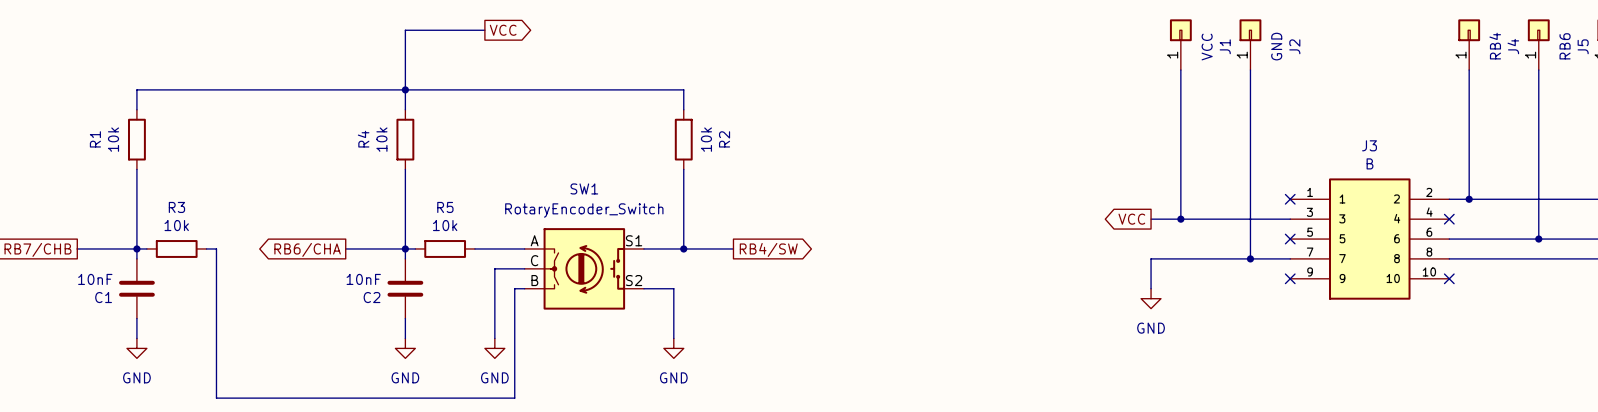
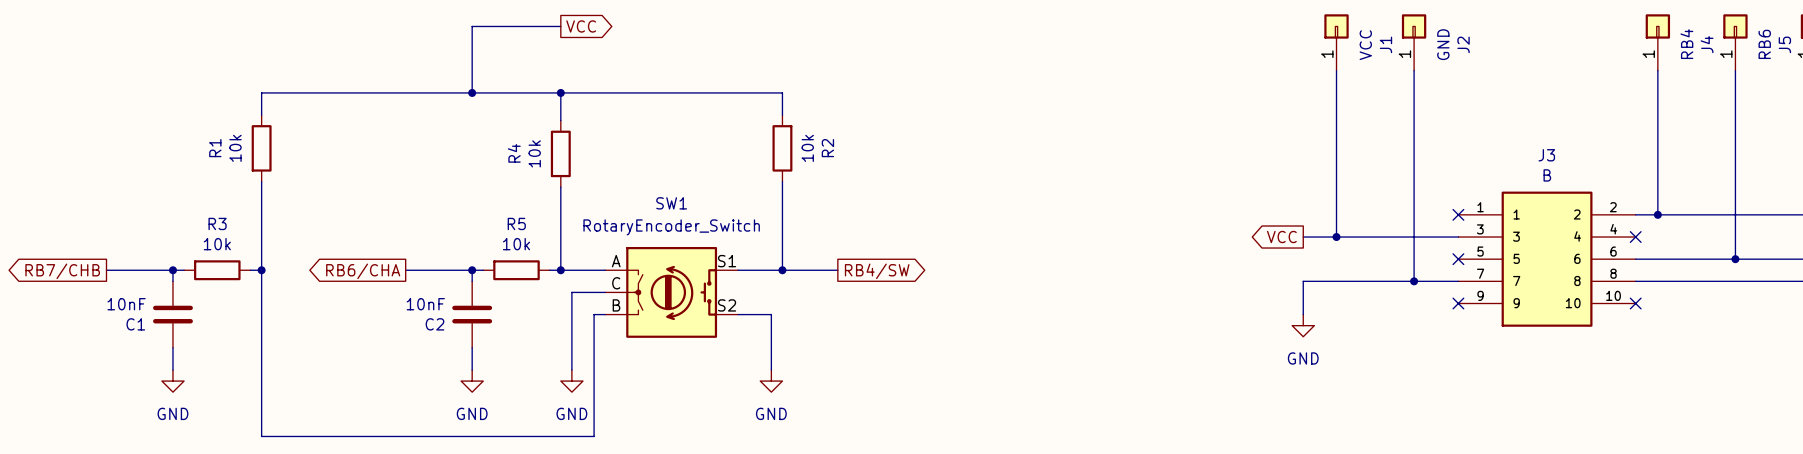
wire: (216, 89) (136, 89) (136, 109) -> (261, 92) (261, 115)
wire: (405, 89) (405, 109) -> none
wire: none -> (560, 92) (560, 120)
junction: none -> (560, 92)
R1 position: (136, 139) -> (261, 148)
R4 position: (405, 139) -> (560, 153)
wire: (136, 169) (136, 248) -> (261, 181) (261, 270)
wire: (405, 169) (405, 248) -> none
wire: none -> (560, 187) (560, 270)
junction: none -> (261, 270)
junction: none -> (560, 270)

